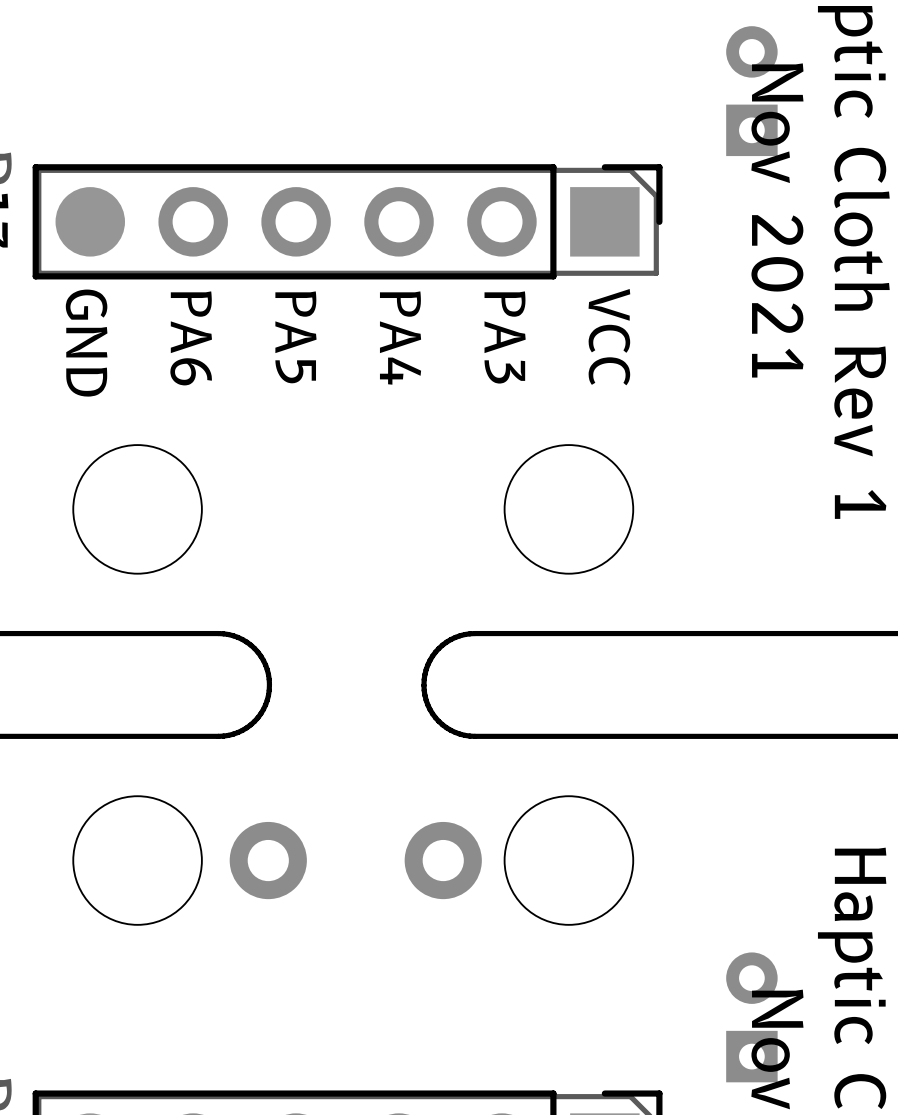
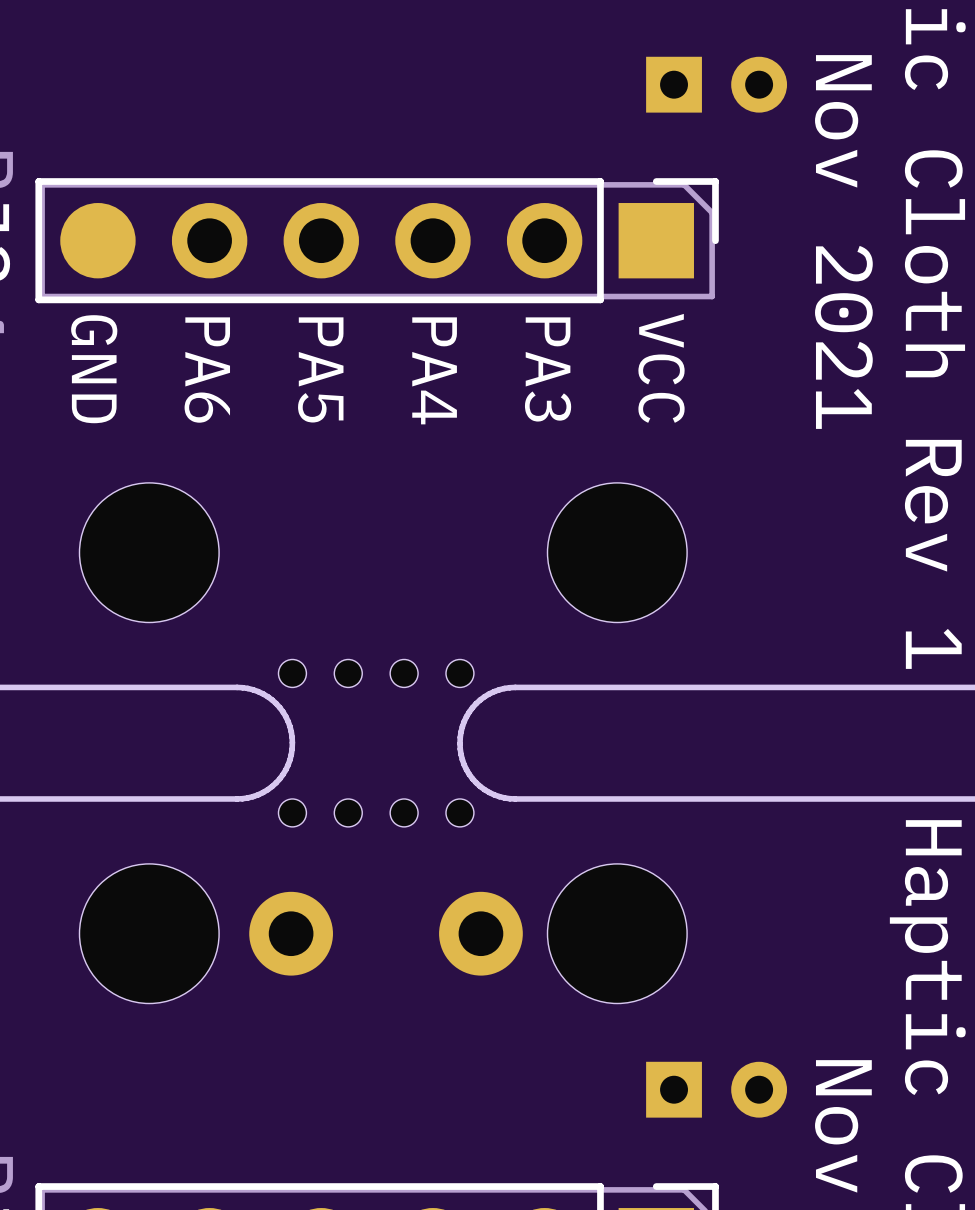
part rotation: 0° (751, 91) -> 90° clockwise (716, 84)
part position: (751, 91) -> (716, 84)
part: none -> (292, 673)
part: none -> (348, 673)
part: none -> (404, 673)
part: none -> (459, 673)
part: none -> (292, 812)
part: none -> (348, 812)
part: none -> (404, 812)
part: none -> (459, 812)
part rotation: 0° (751, 1017) -> 90° clockwise (716, 1089)
part position: (751, 1017) -> (716, 1089)

